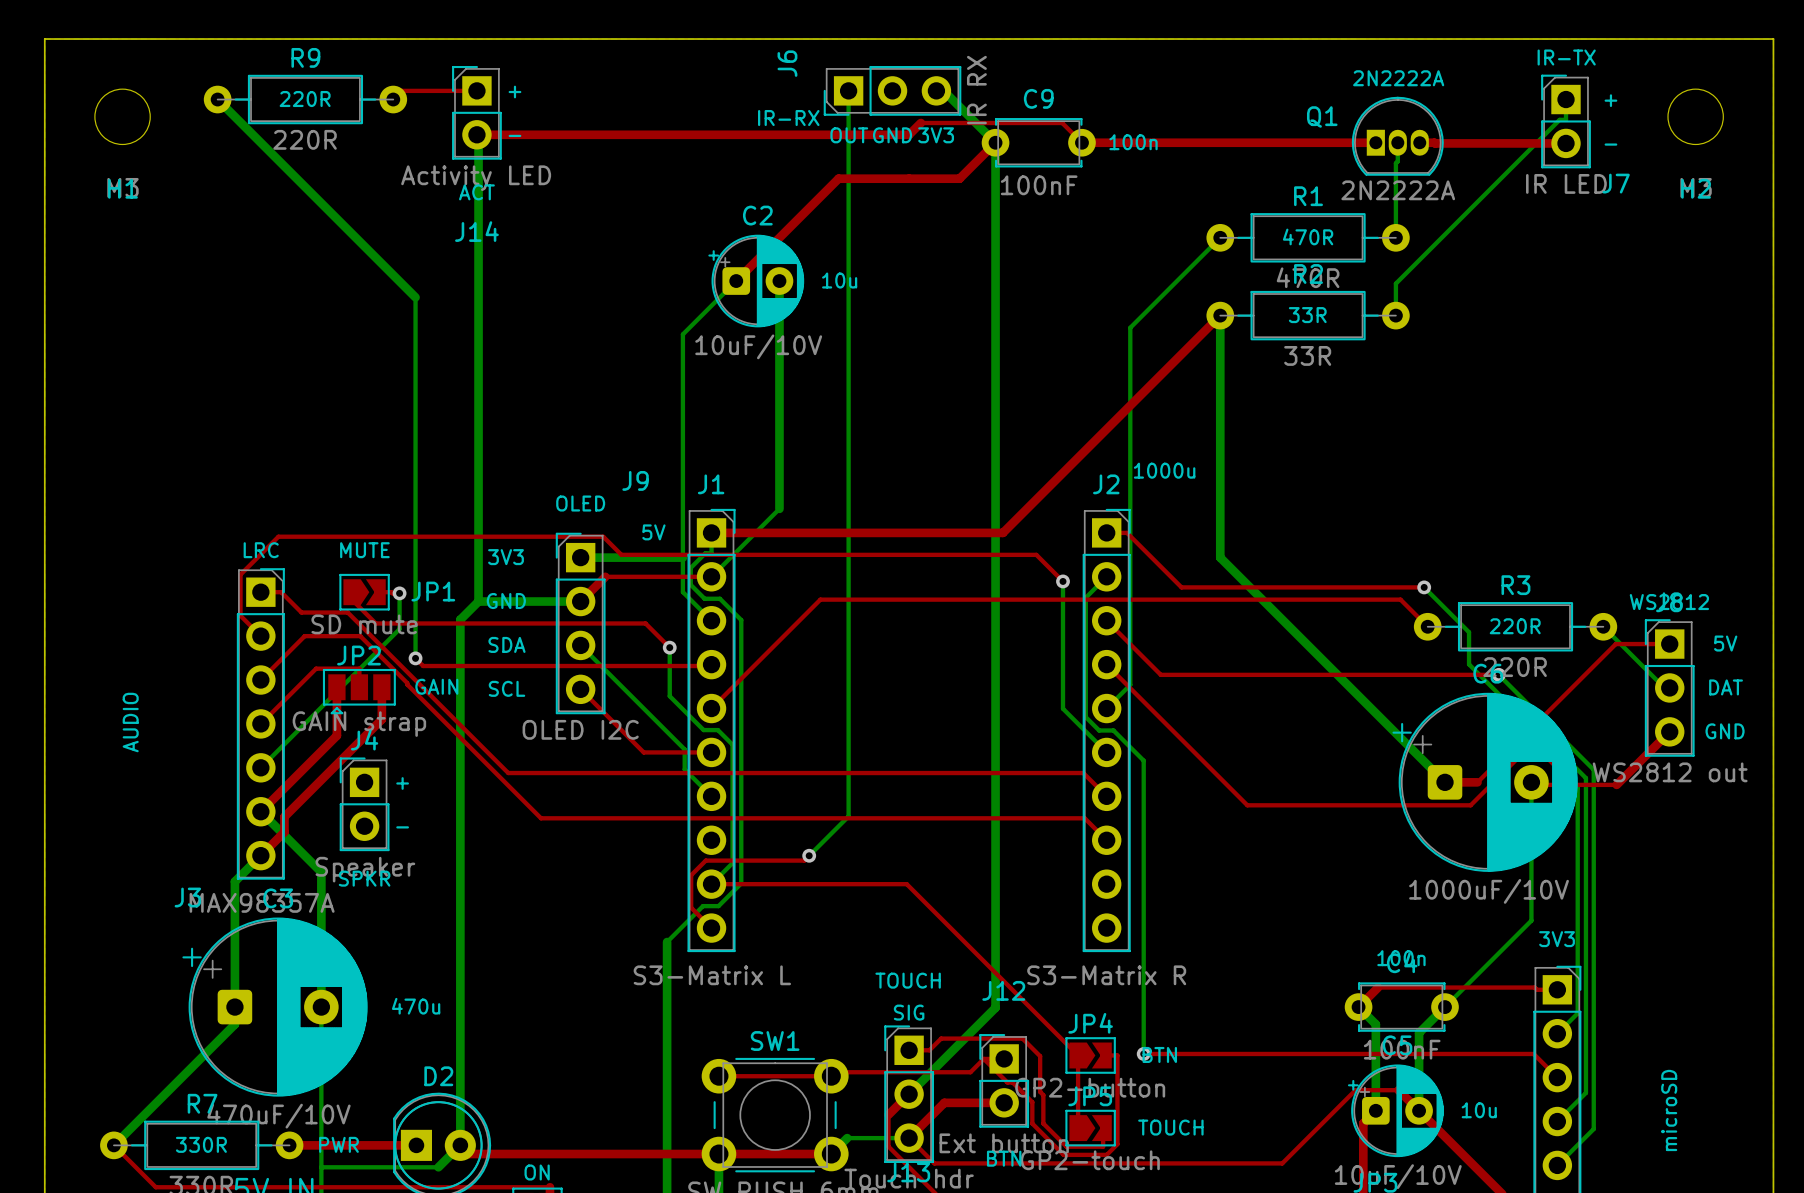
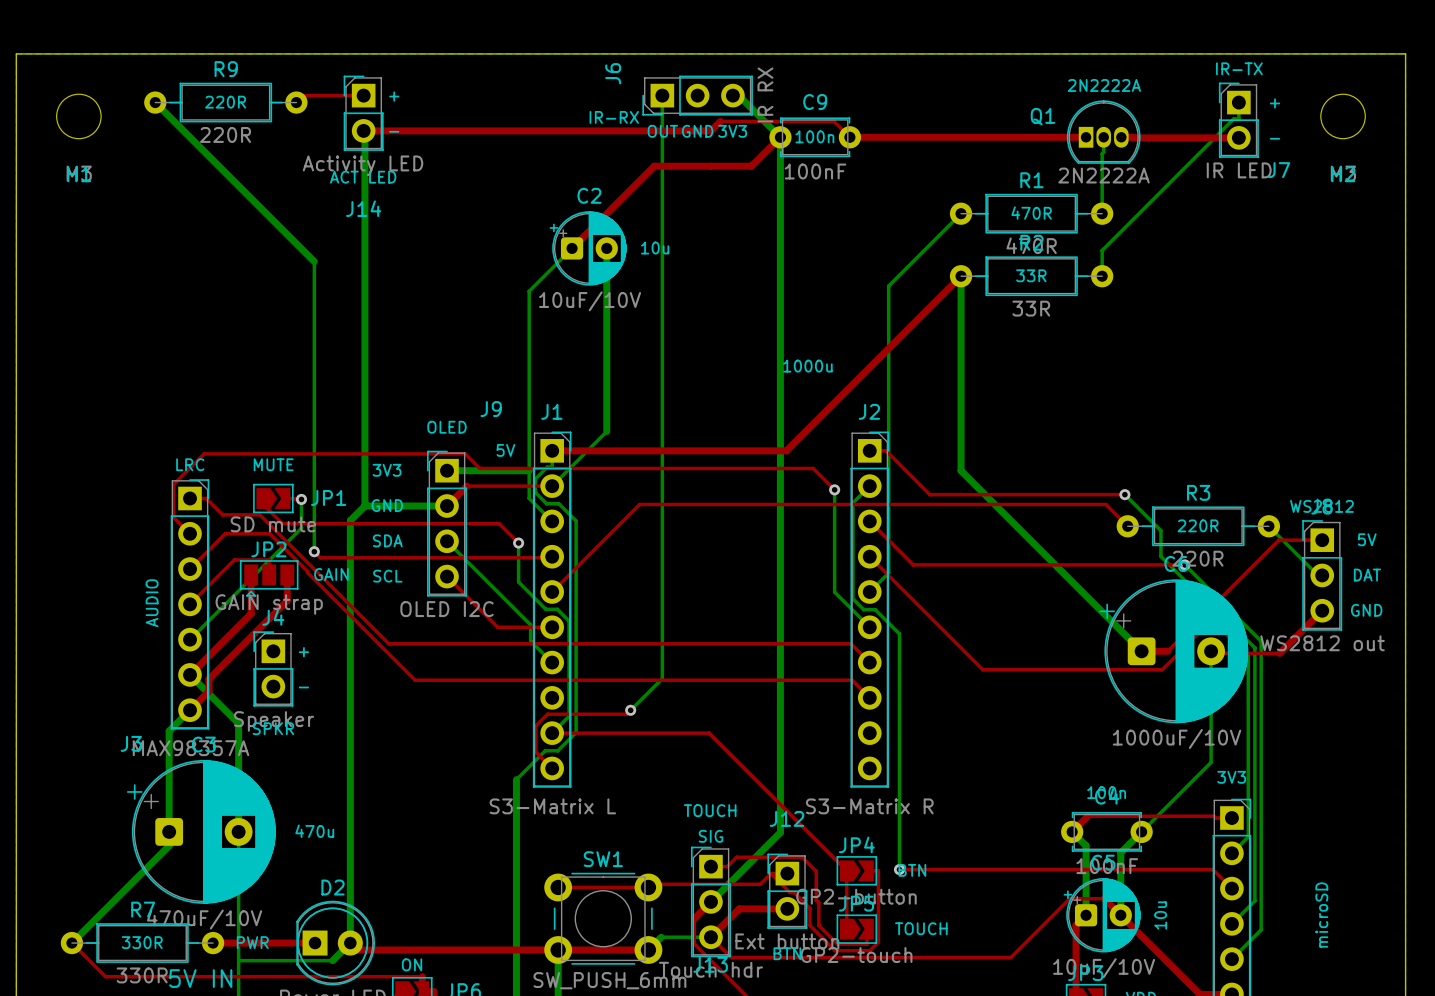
text position: 100n (1133, 142) -> 100n (814, 136)
text: ACT (476, 192) -> ACT LED (363, 177)
text position: 1000u (1164, 470) -> 1000u (807, 366)
text position: AUDIO (130, 722) -> AUDIO (152, 603)
text rotation: 0° (1479, 1110) -> 90° counterclockwise (1160, 915)

